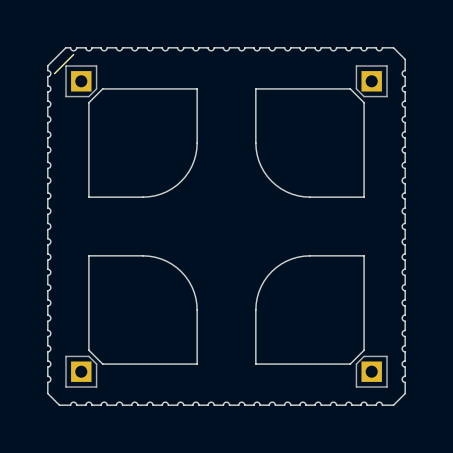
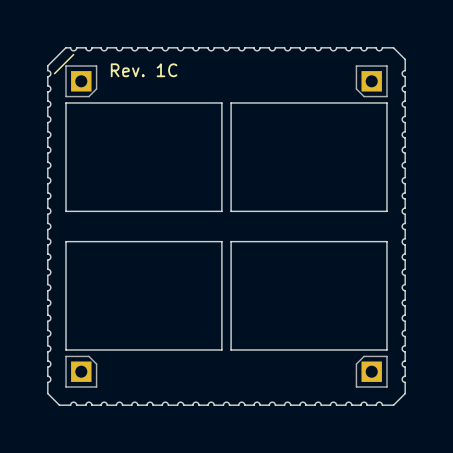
text: none -> Rev. 1C (144, 70)
board edge: (102, 88) (197, 88) (195, 155) (188, 171) (176, 185) (166, 191) (149, 196) (88, 197) (88, 102) (102, 88) -> (66, 102) (66, 211) (221, 211) (221, 102) (66, 102)
board edge: (255, 88) (257, 155) (261, 166) (271, 181) (286, 191) (297, 195) (364, 197) (364, 102) (350, 88) (255, 88) -> (231, 102) (231, 211) (386, 211) (386, 102) (231, 102)
board edge: (88, 255) (155, 257) (166, 261) (181, 271) (191, 286) (195, 297) (197, 364) (102, 364) (88, 350) (88, 255) -> (66, 241) (66, 349) (221, 349) (221, 241) (66, 241)
board edge: (309, 255) (364, 255) (364, 350) (350, 364) (255, 364) (256, 303) (261, 286) (271, 271) (281, 264) (292, 258) (309, 255) -> (231, 241) (231, 349) (386, 349) (386, 241) (231, 241)

